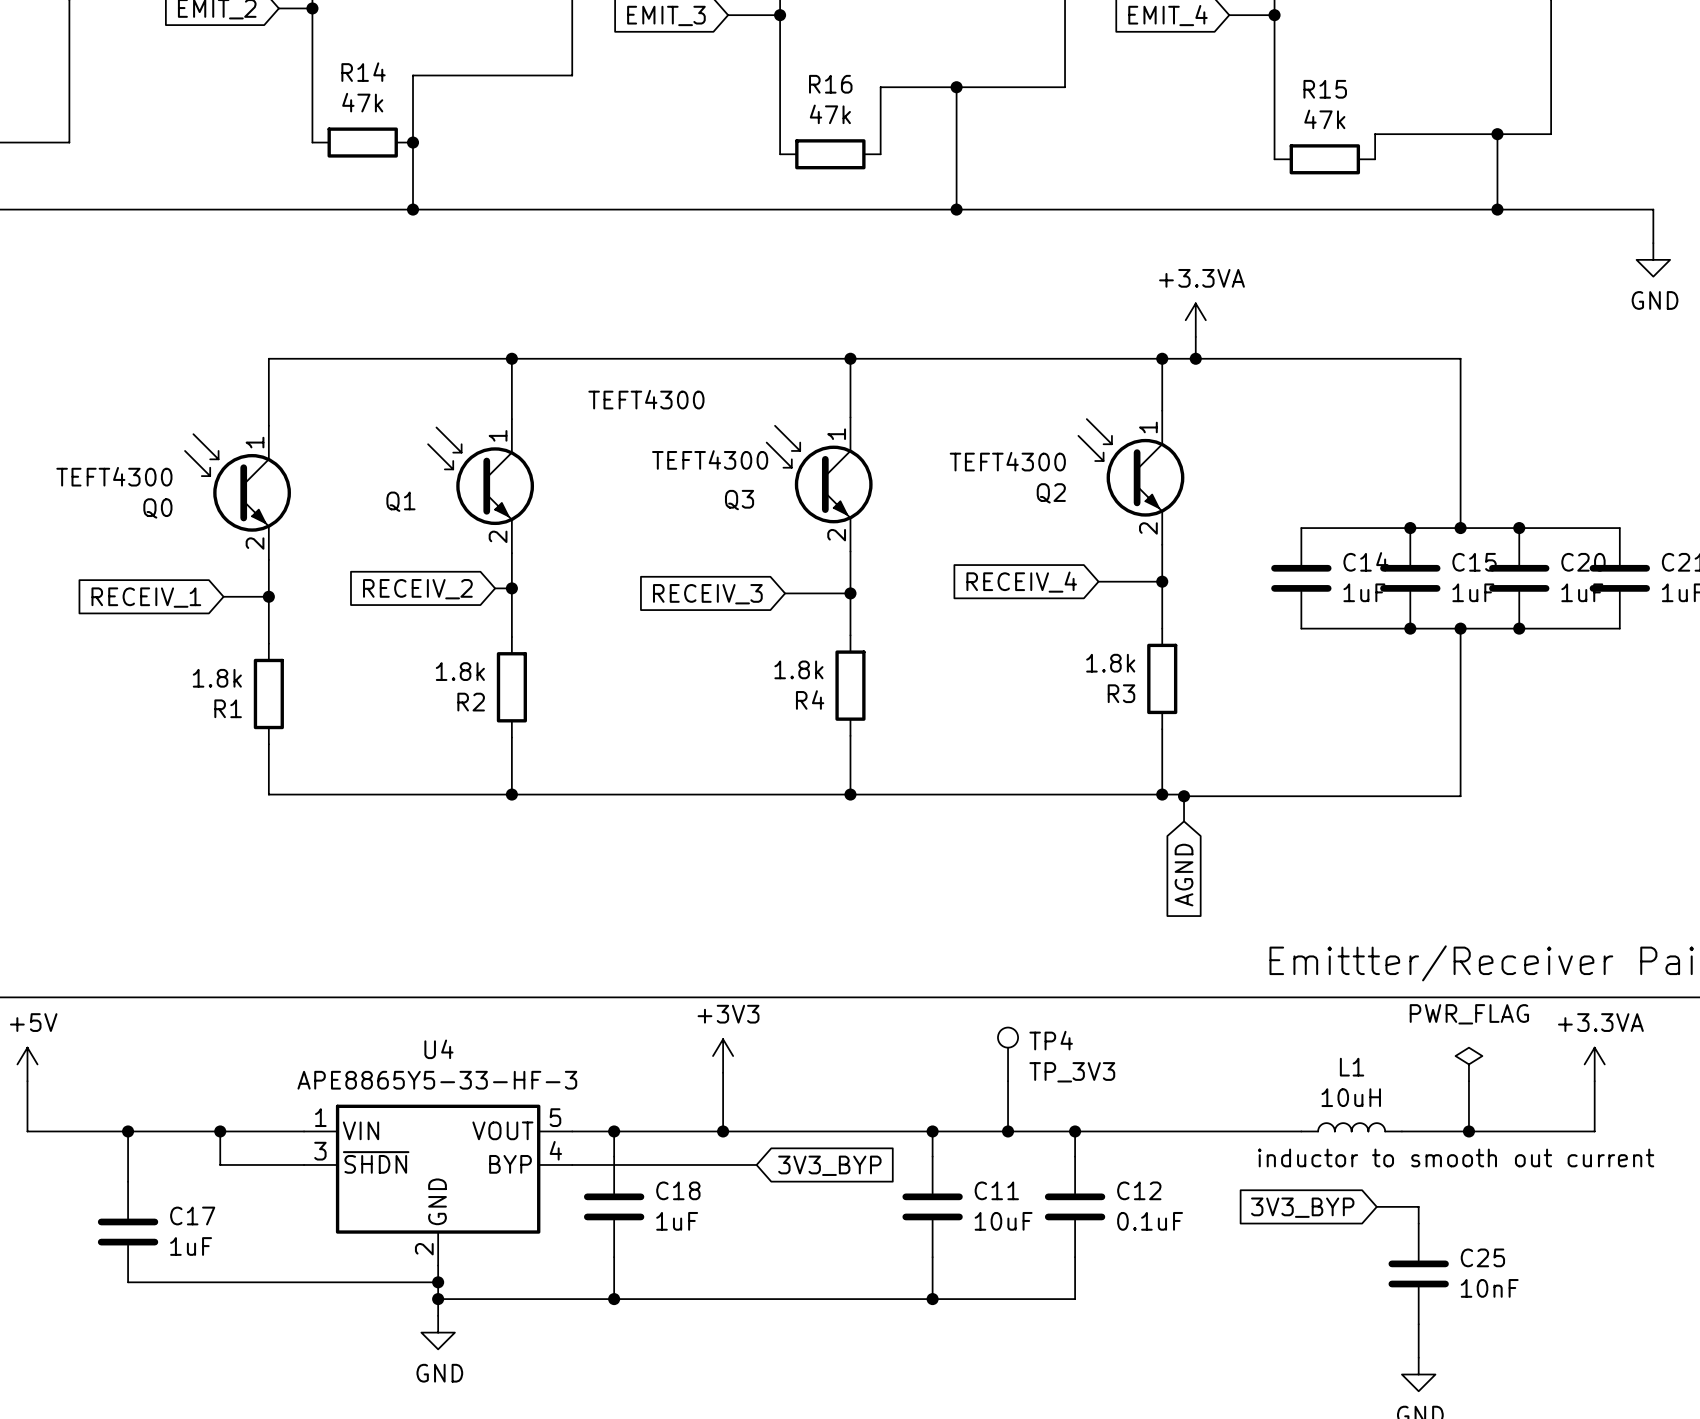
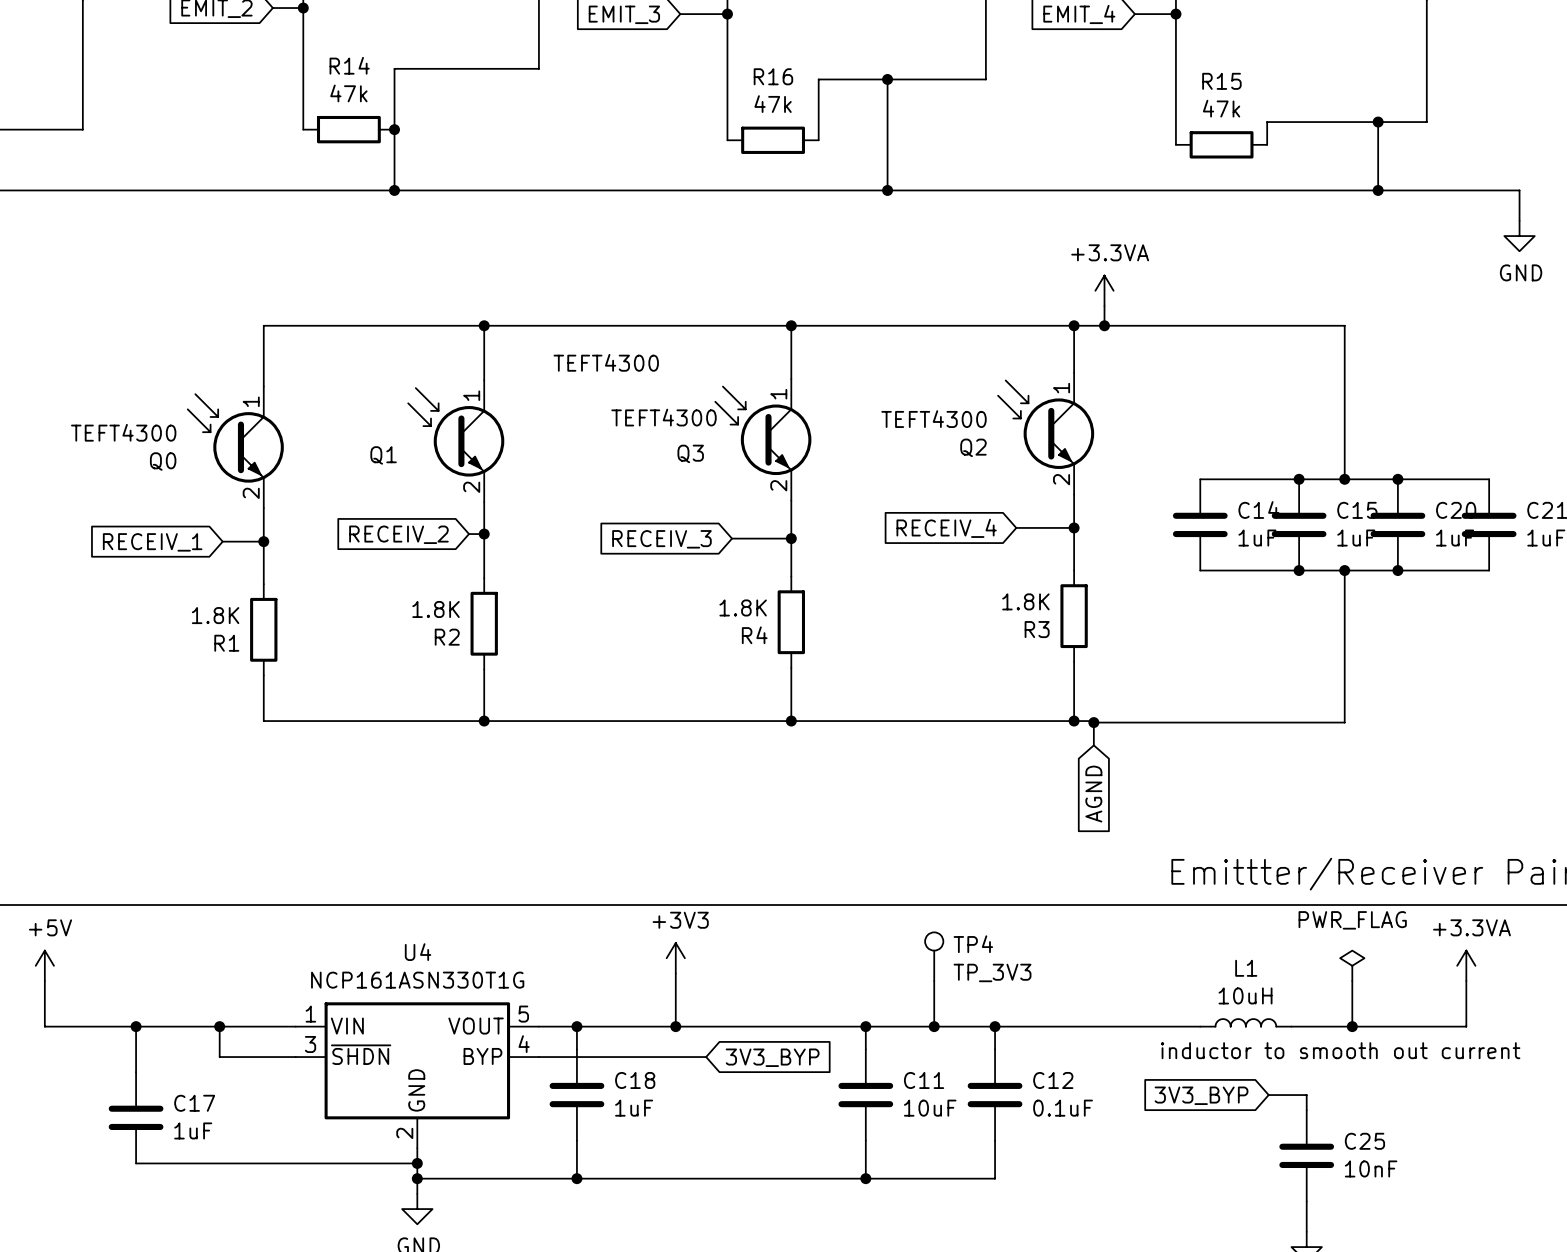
R3 value: 1.8k (1110, 663) -> 1.8K (1025, 601)
R4 value: 1.8k (798, 669) -> 1.8K (743, 607)
R2 value: 1.8k (460, 671) -> 1.8K (436, 609)
R1 value: 1.8k (217, 678) -> 1.8K (215, 615)
U4 value: APE8865Y5-33-HF-3 (437, 1080) -> NCP161ASN330T1G (417, 980)

